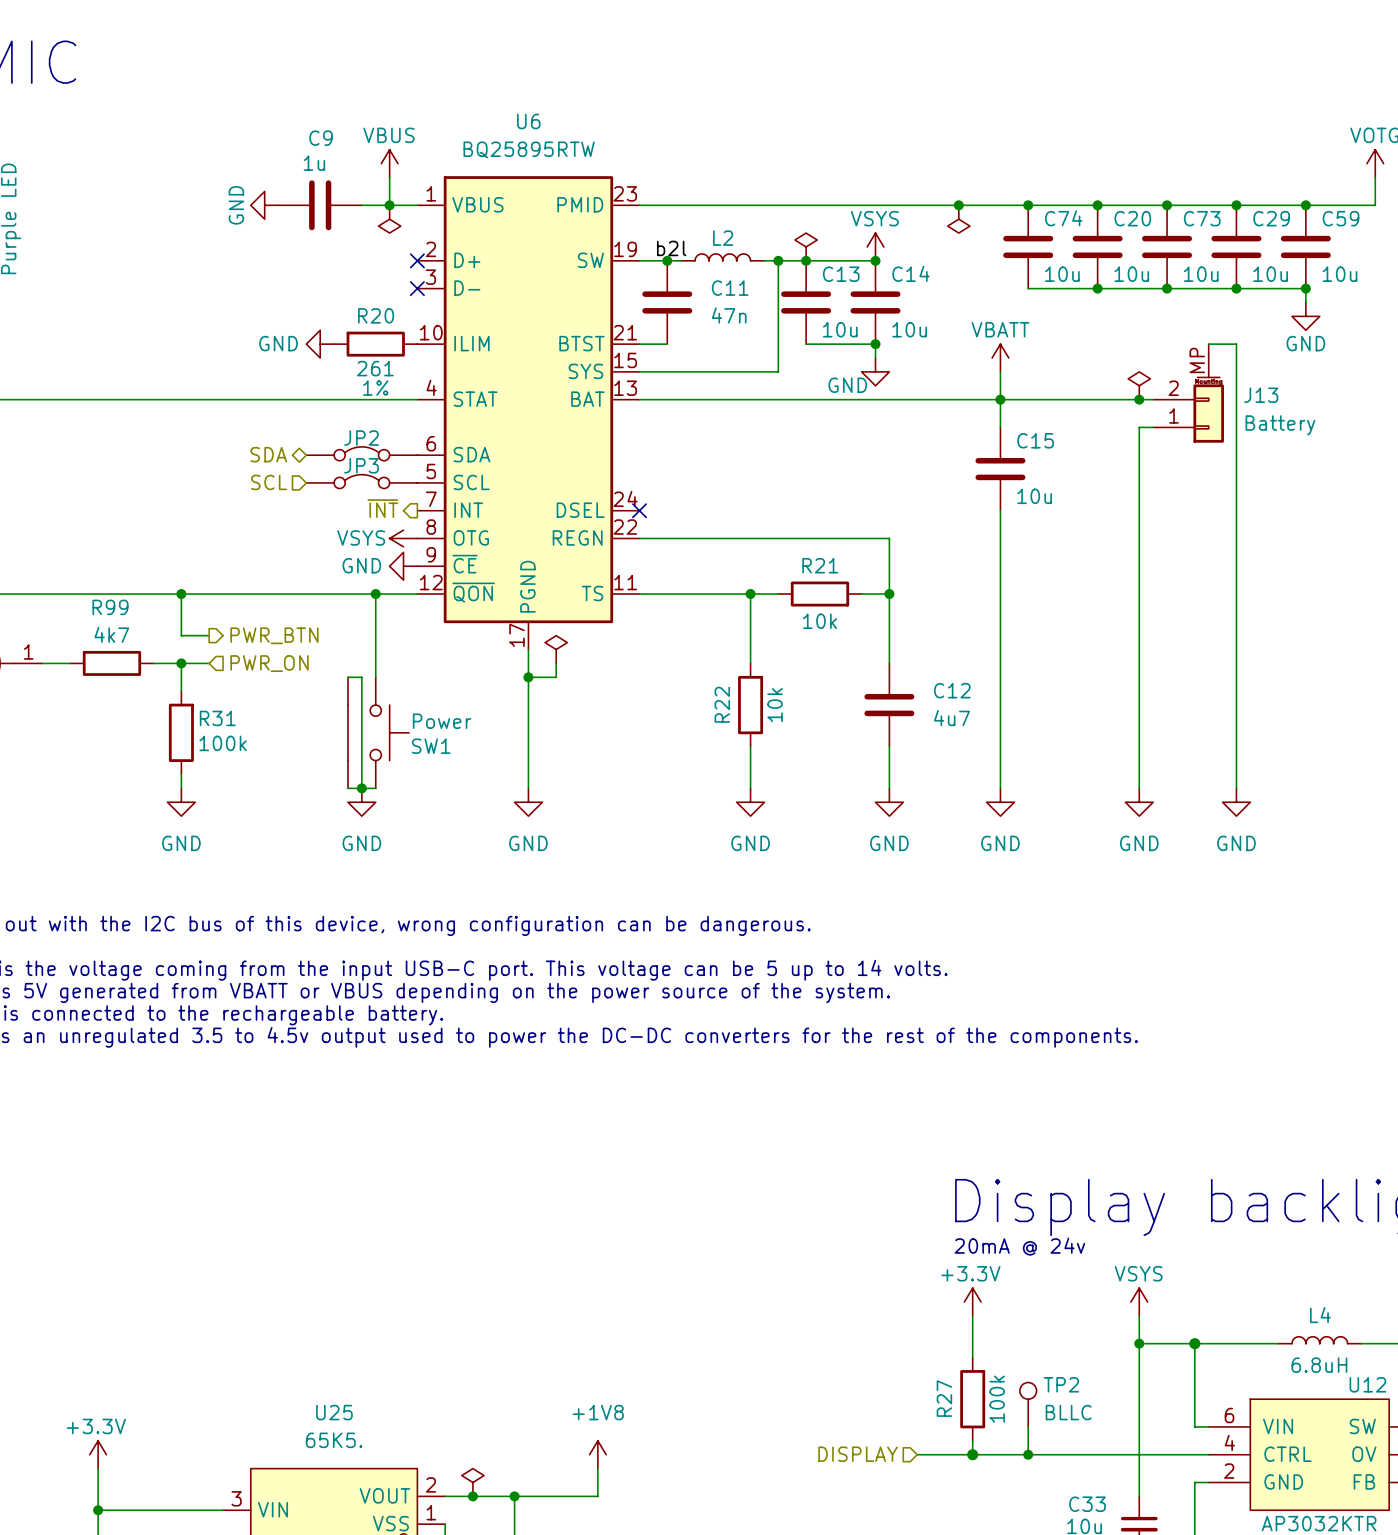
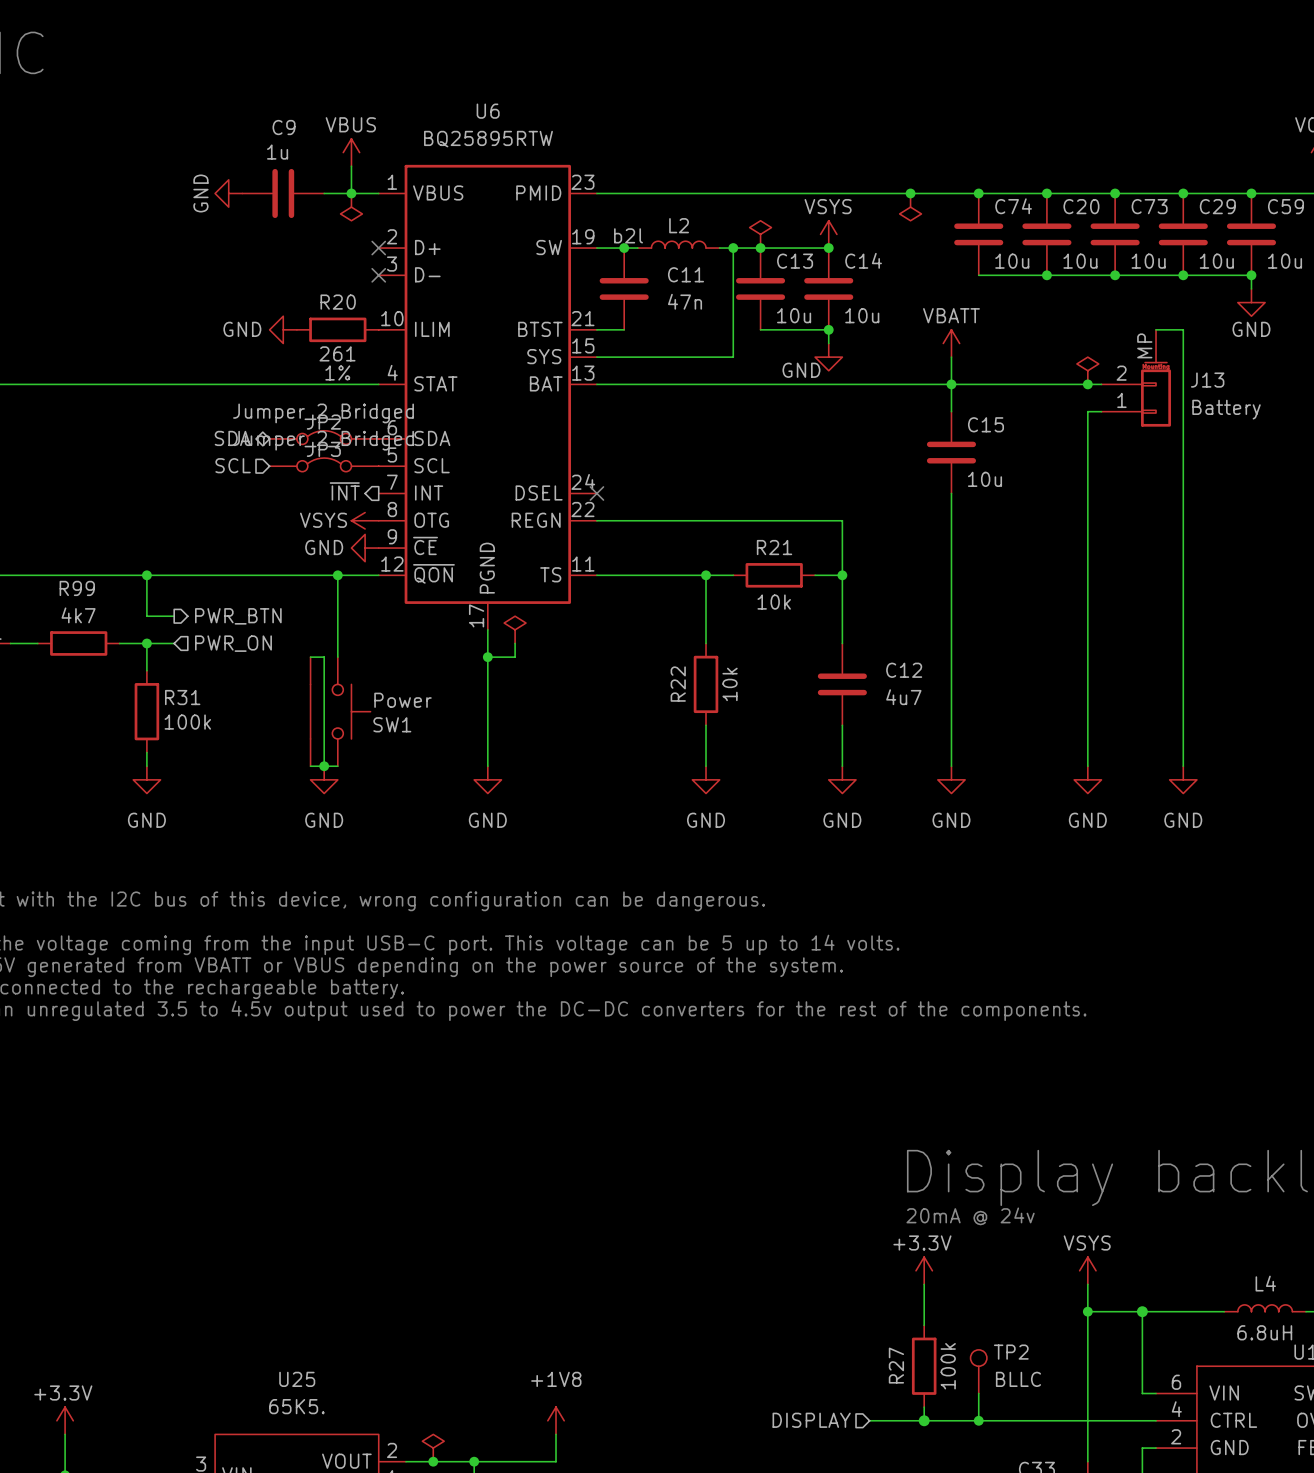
JP2 value: none -> Jumper_2_Bridged (323, 413)
JP3 value: none -> Jumper_2_Bridged (323, 440)

